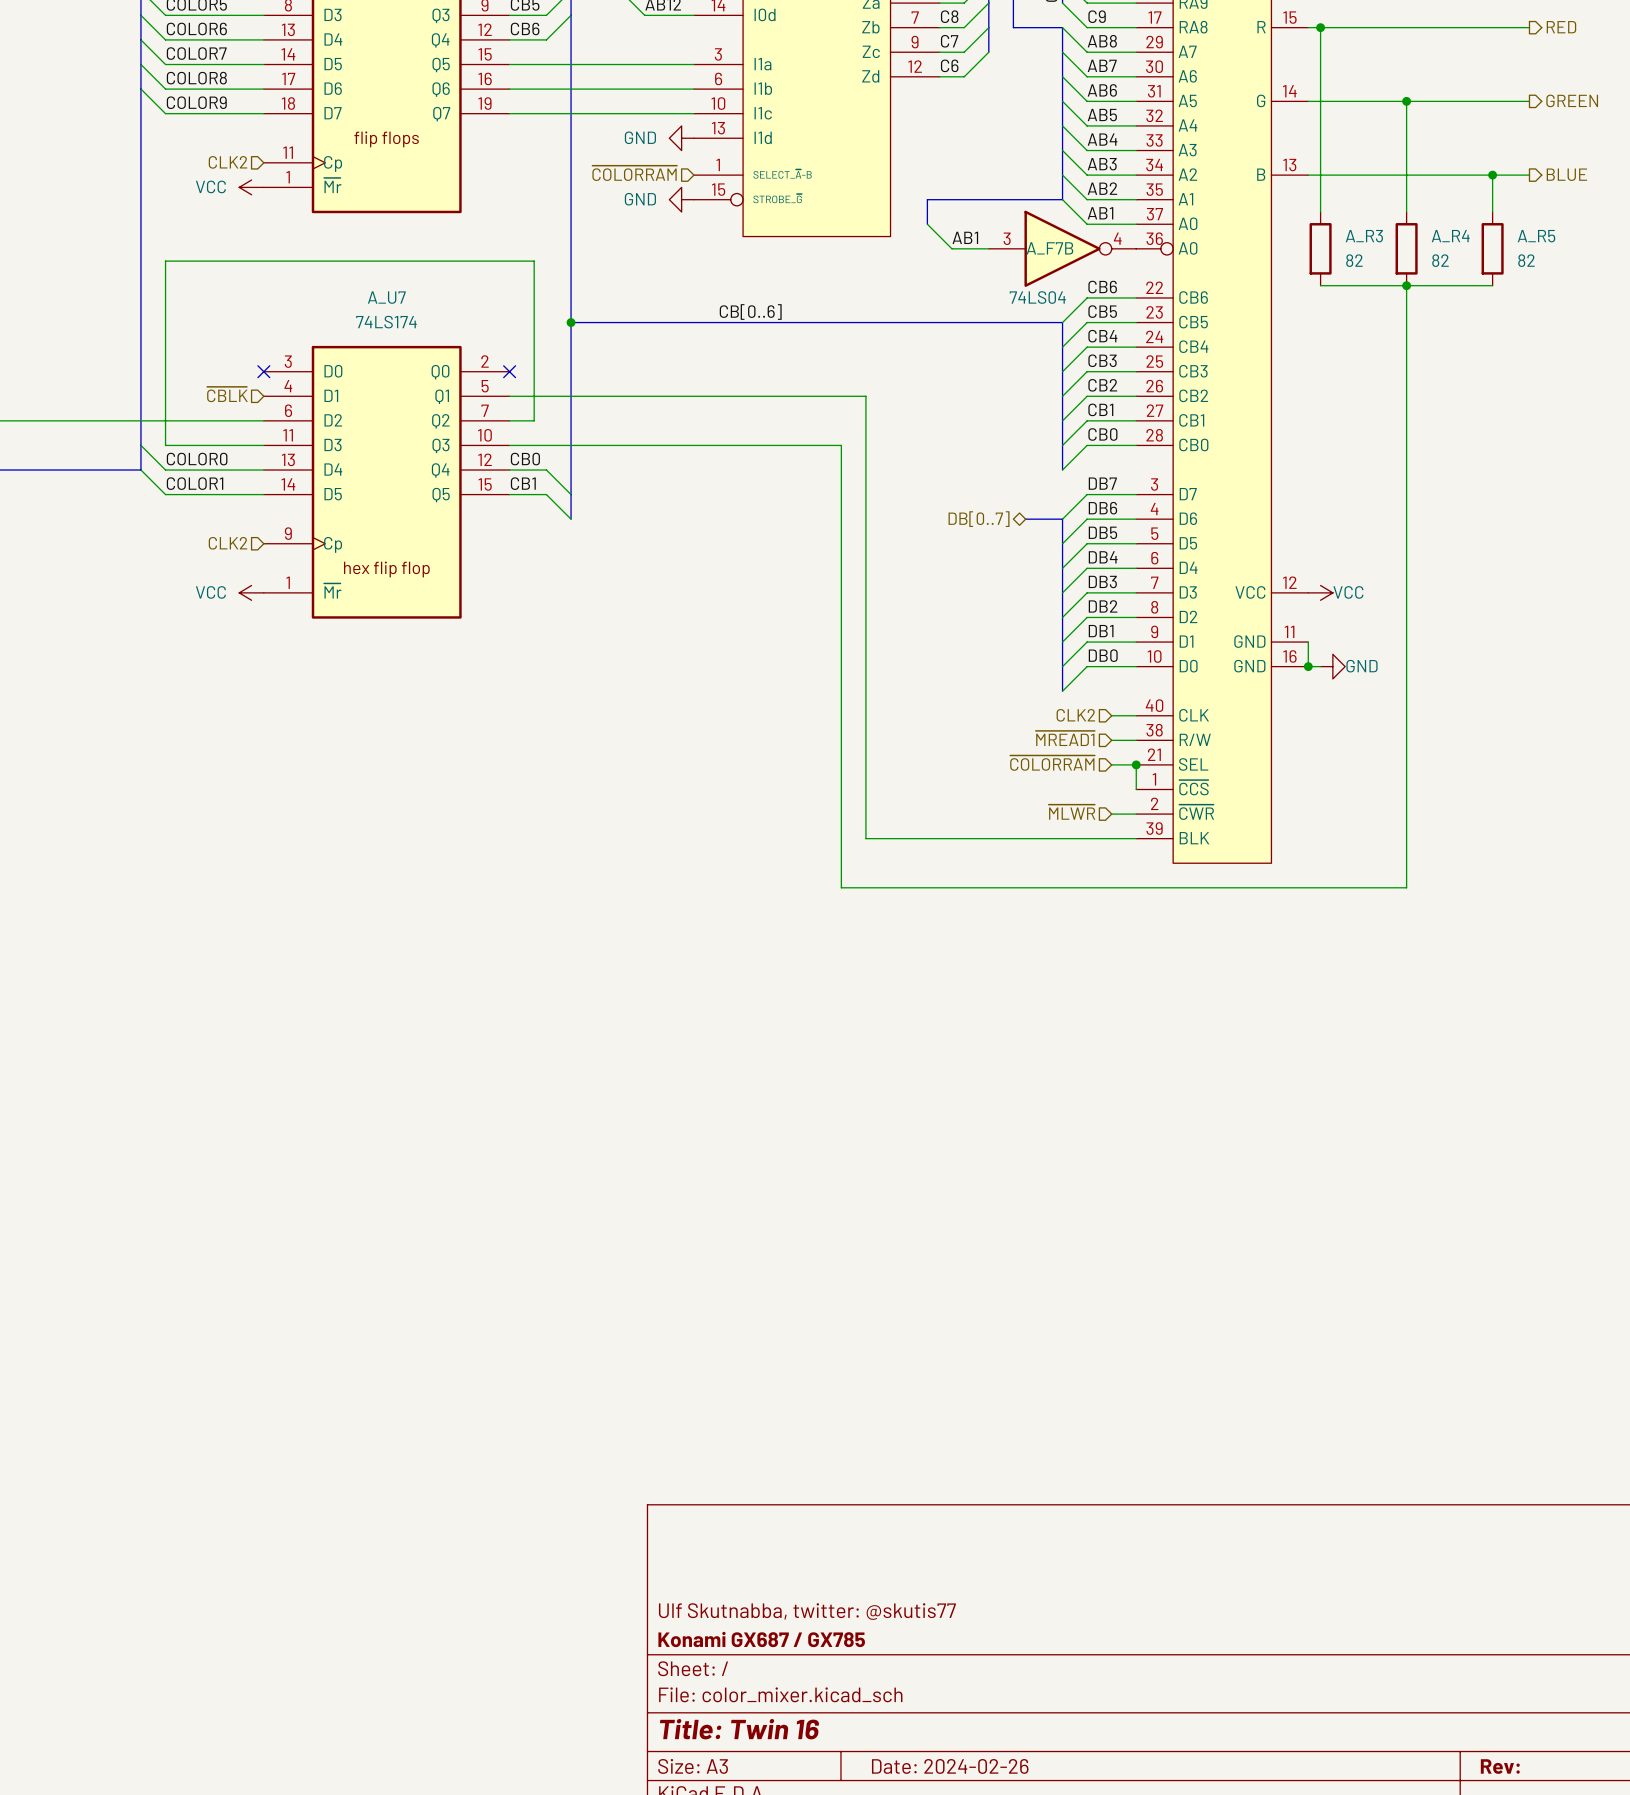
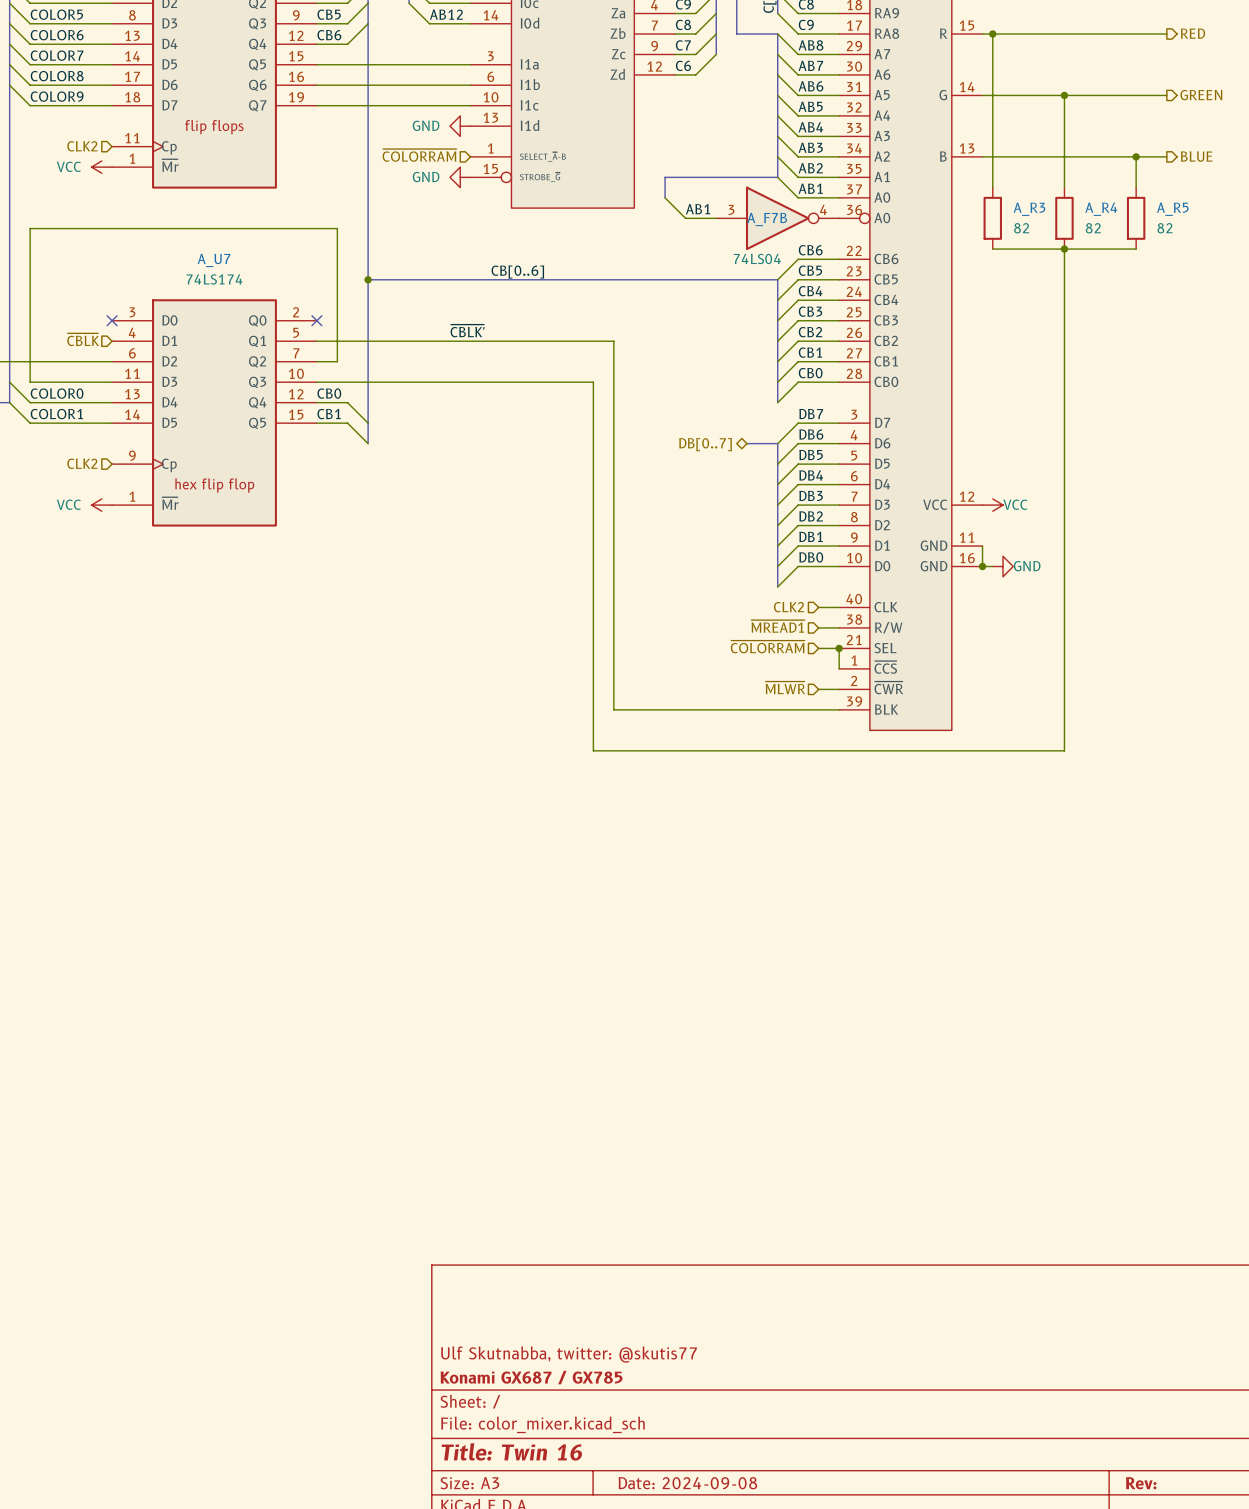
label: none -> ~{CBLK'} (467, 330)
title block: Date: 2024-02-26 (950, 1766) -> Date: 2024-09-08 (687, 1483)

